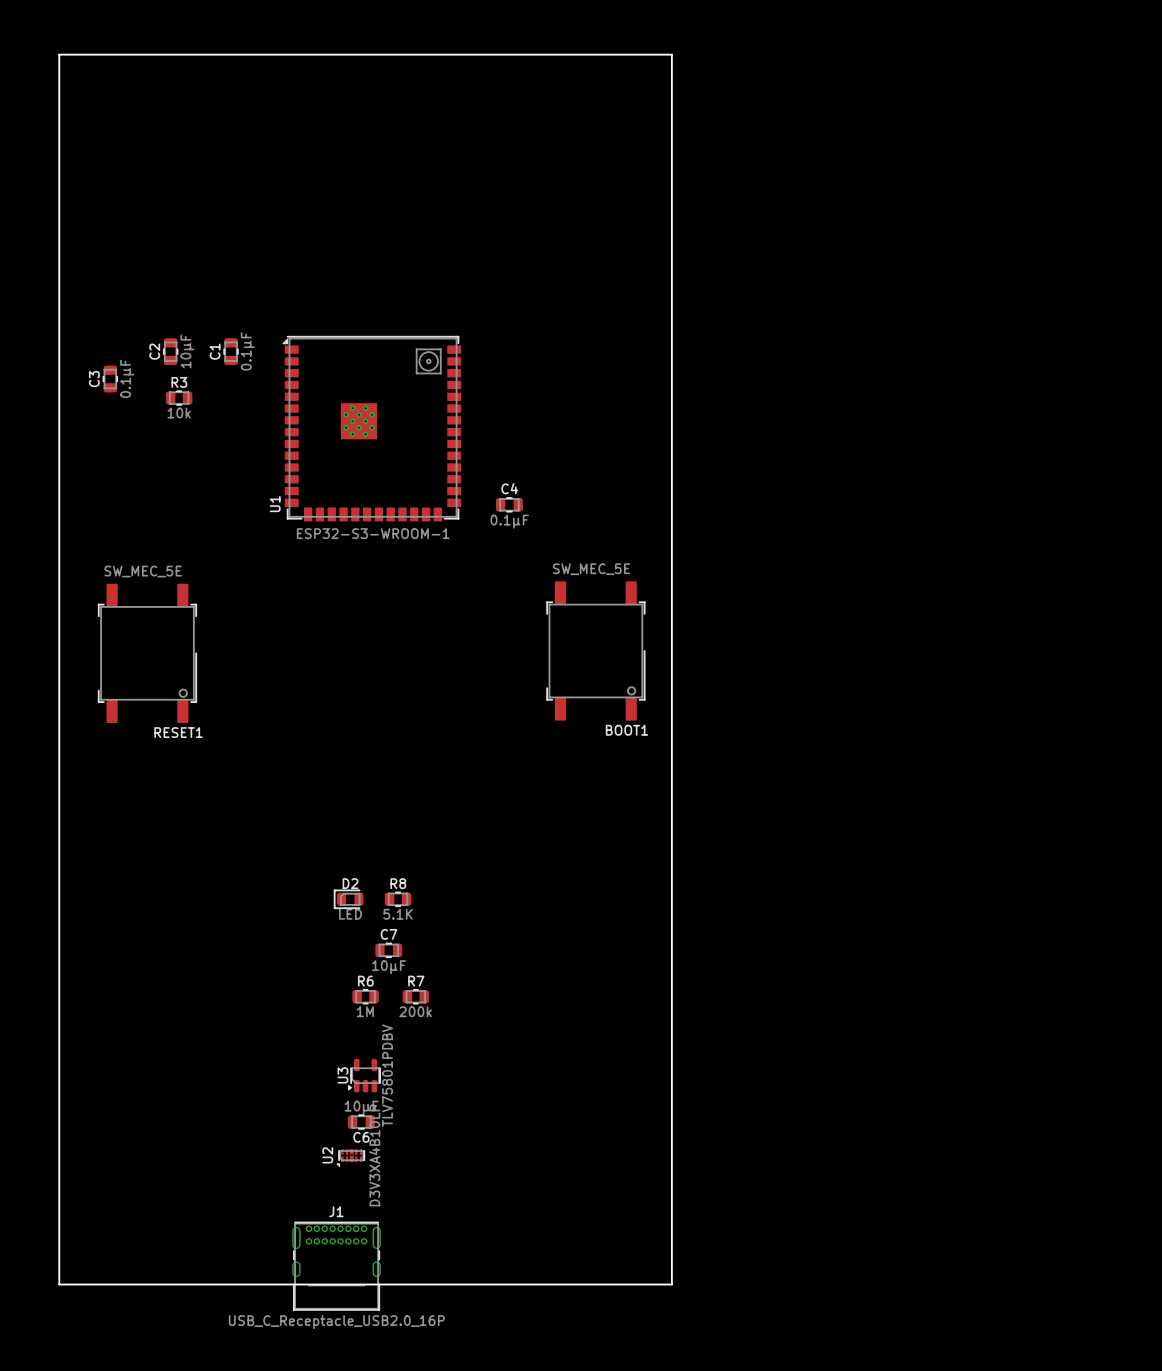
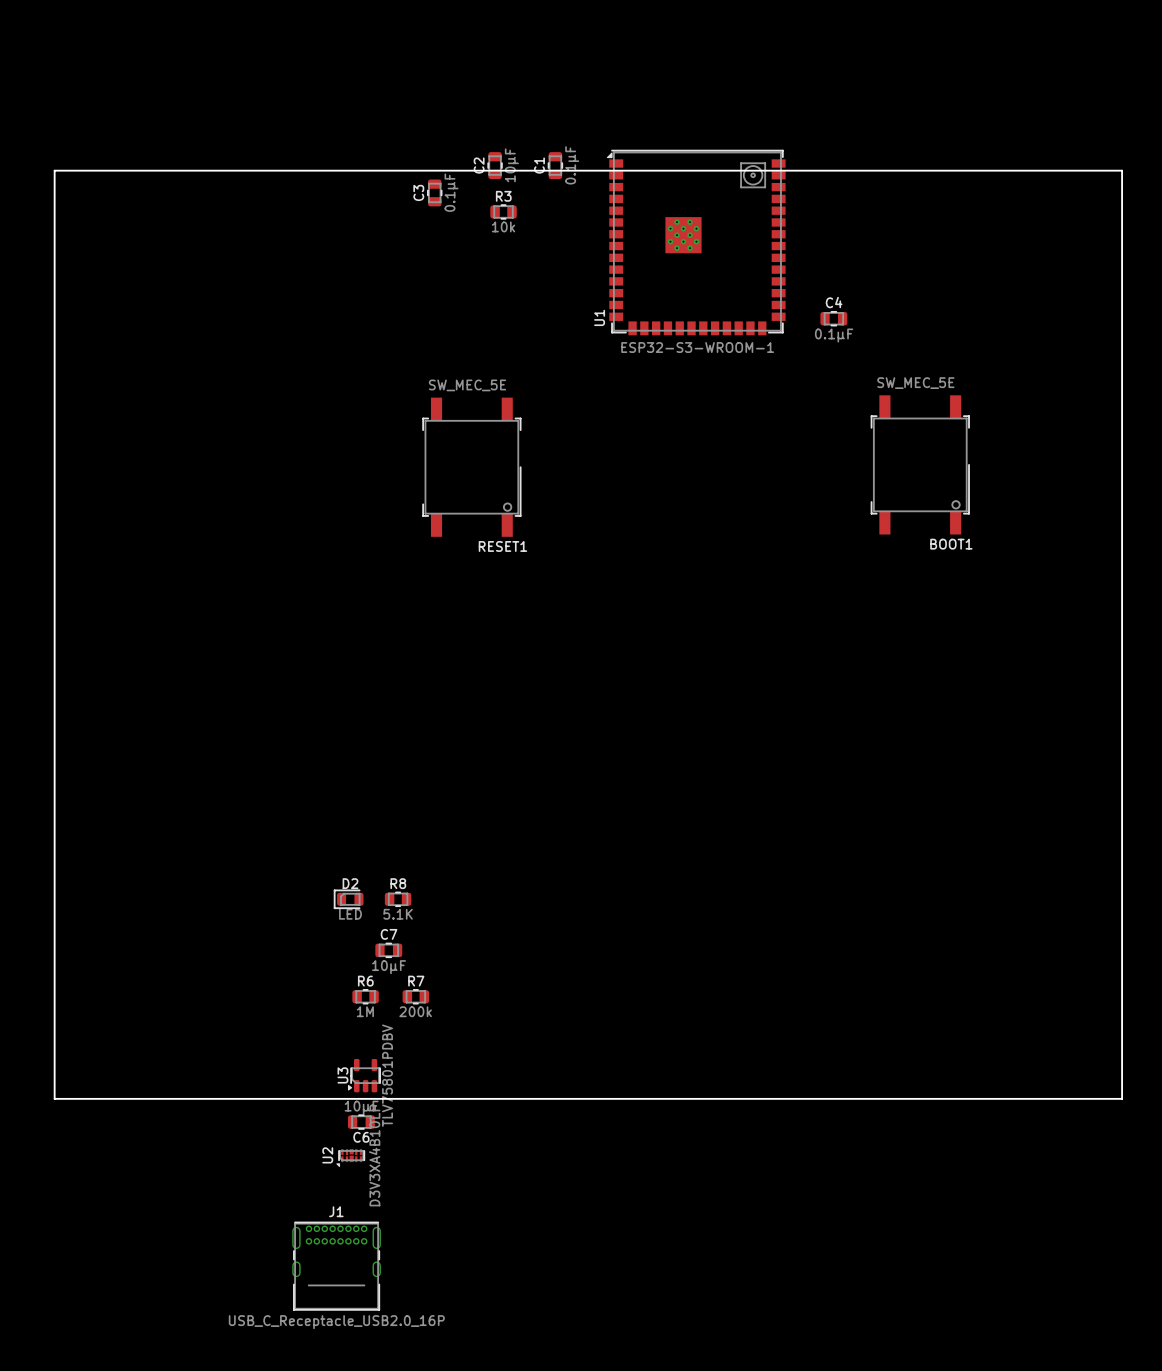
board edge: (59, 54) (671, 54) (671, 1284) (59, 1284) (59, 54) -> none
board edge: none -> (54, 170) (1122, 170) (1122, 1098) (54, 1098) (54, 170)
C2 position: (170, 351) -> (495, 165)
C1 position: (231, 351) -> (555, 165)
C3 position: (110, 379) -> (434, 192)
R3 position: (179, 398) -> (503, 211)
U1 position: (371, 428) -> (696, 242)
C4 position: (509, 504) -> (833, 318)
BOOT1 position: (595, 651) -> (920, 464)
RESET1 position: (147, 653) -> (471, 467)

